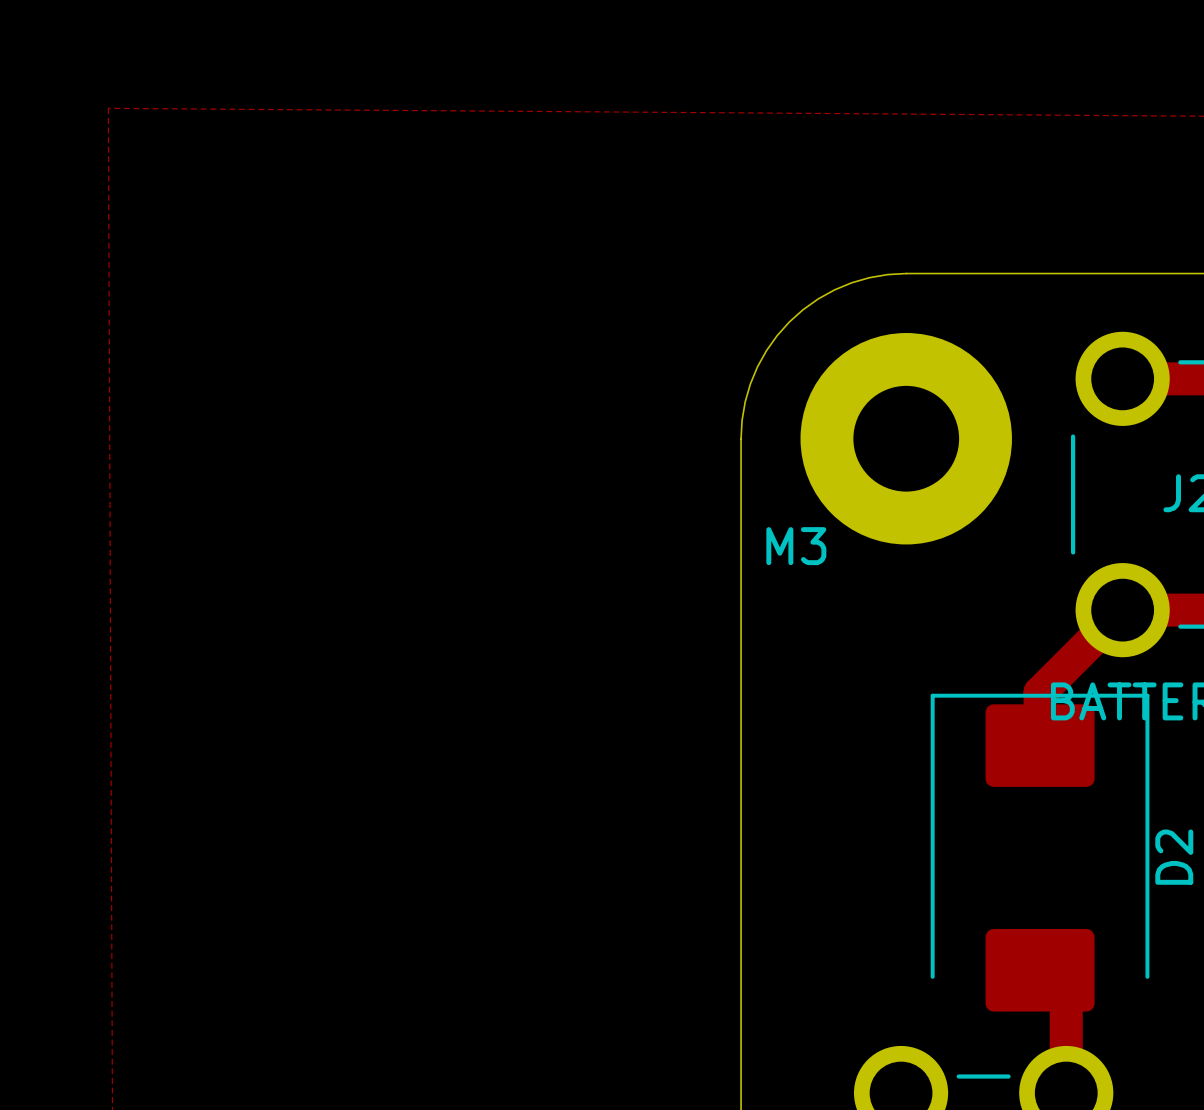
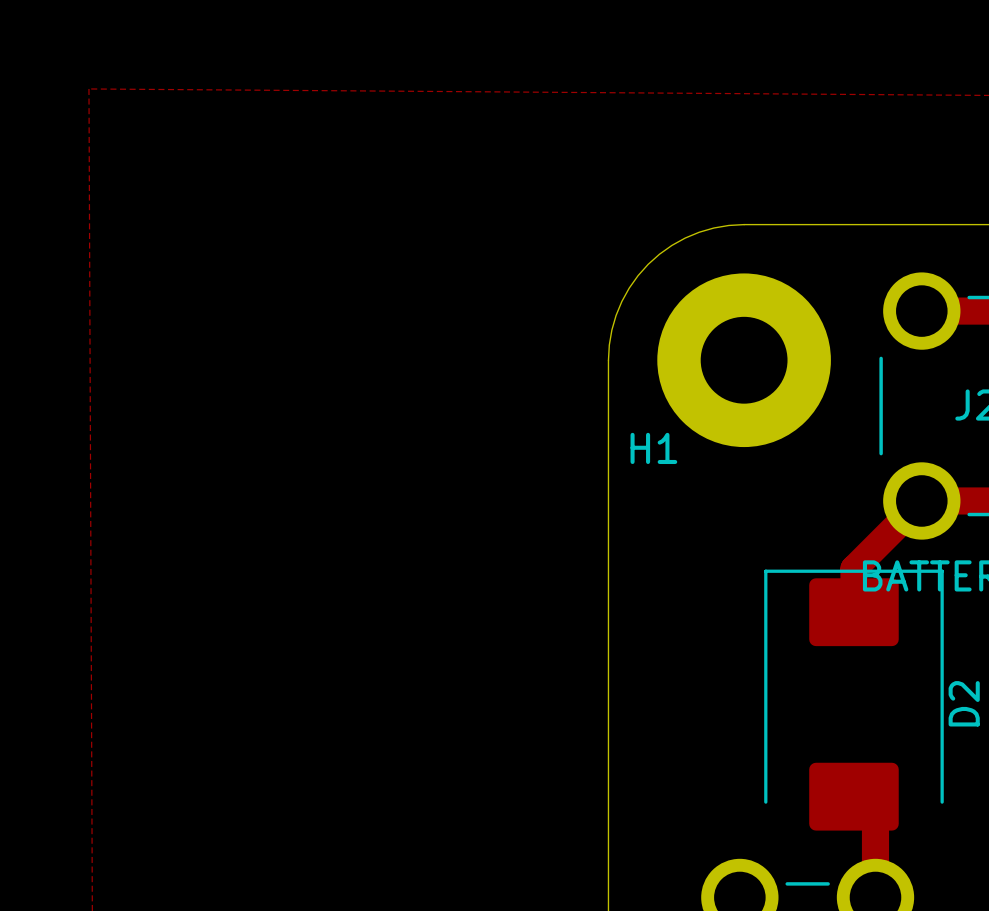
M3 name: M3 (796, 546) -> H1 (653, 448)

